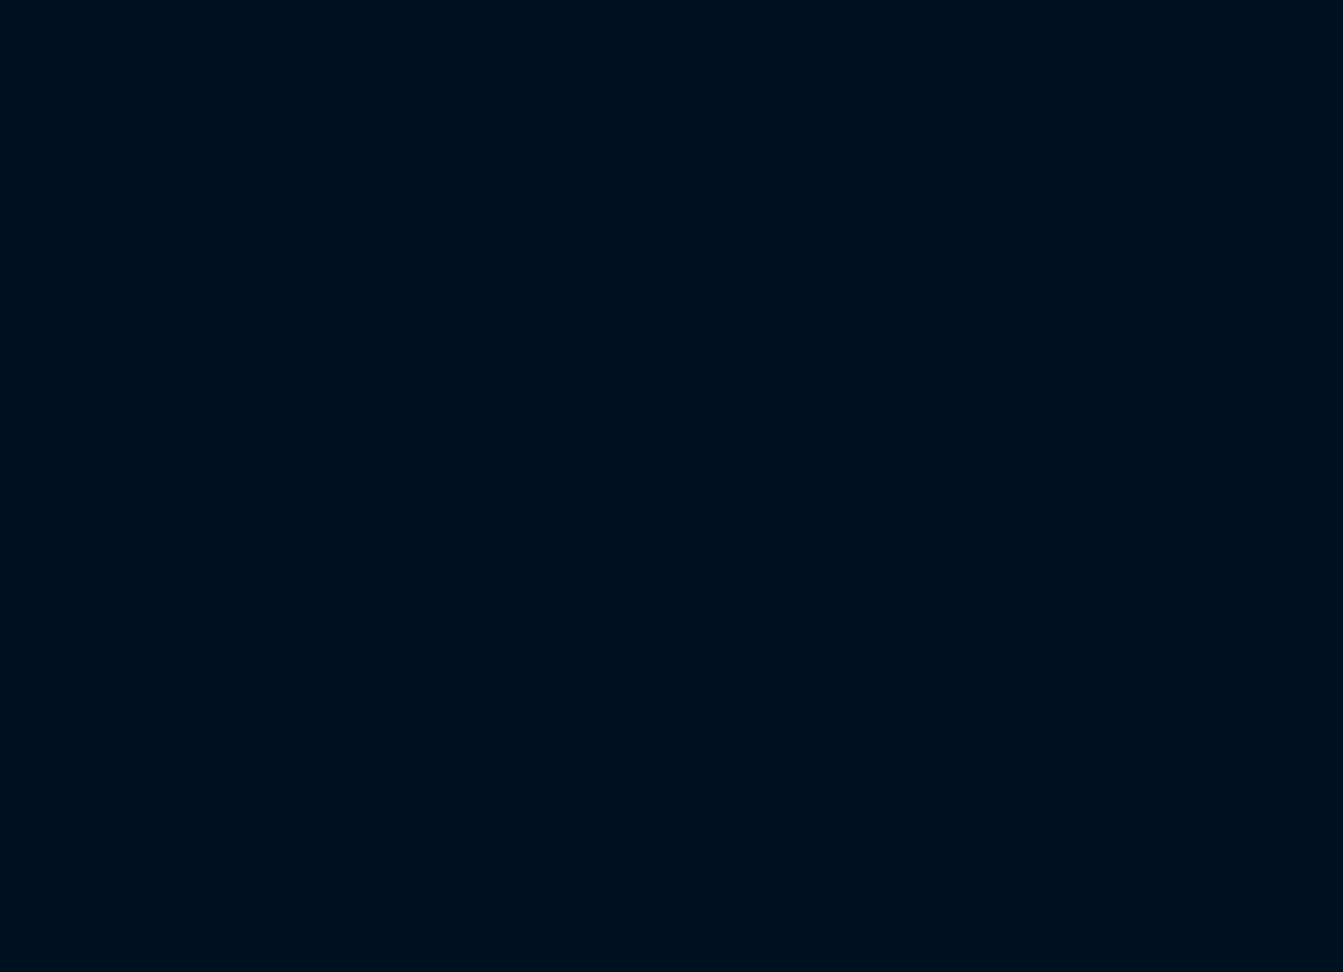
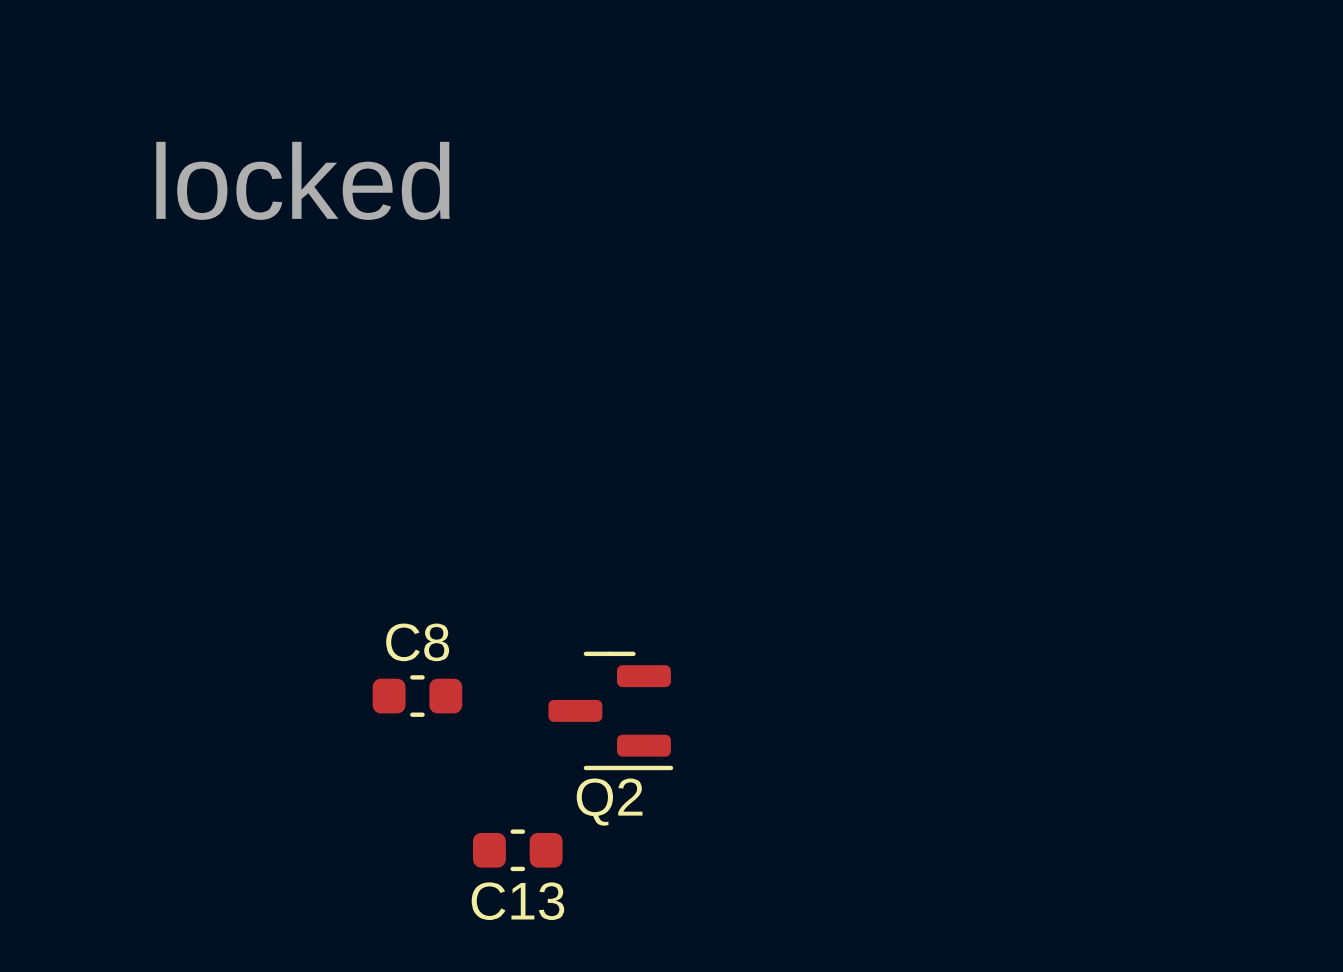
text: none -> locked (302, 180)
C8: none -> (417, 696)
Q2: none -> (610, 710)
C13: none -> (517, 850)

